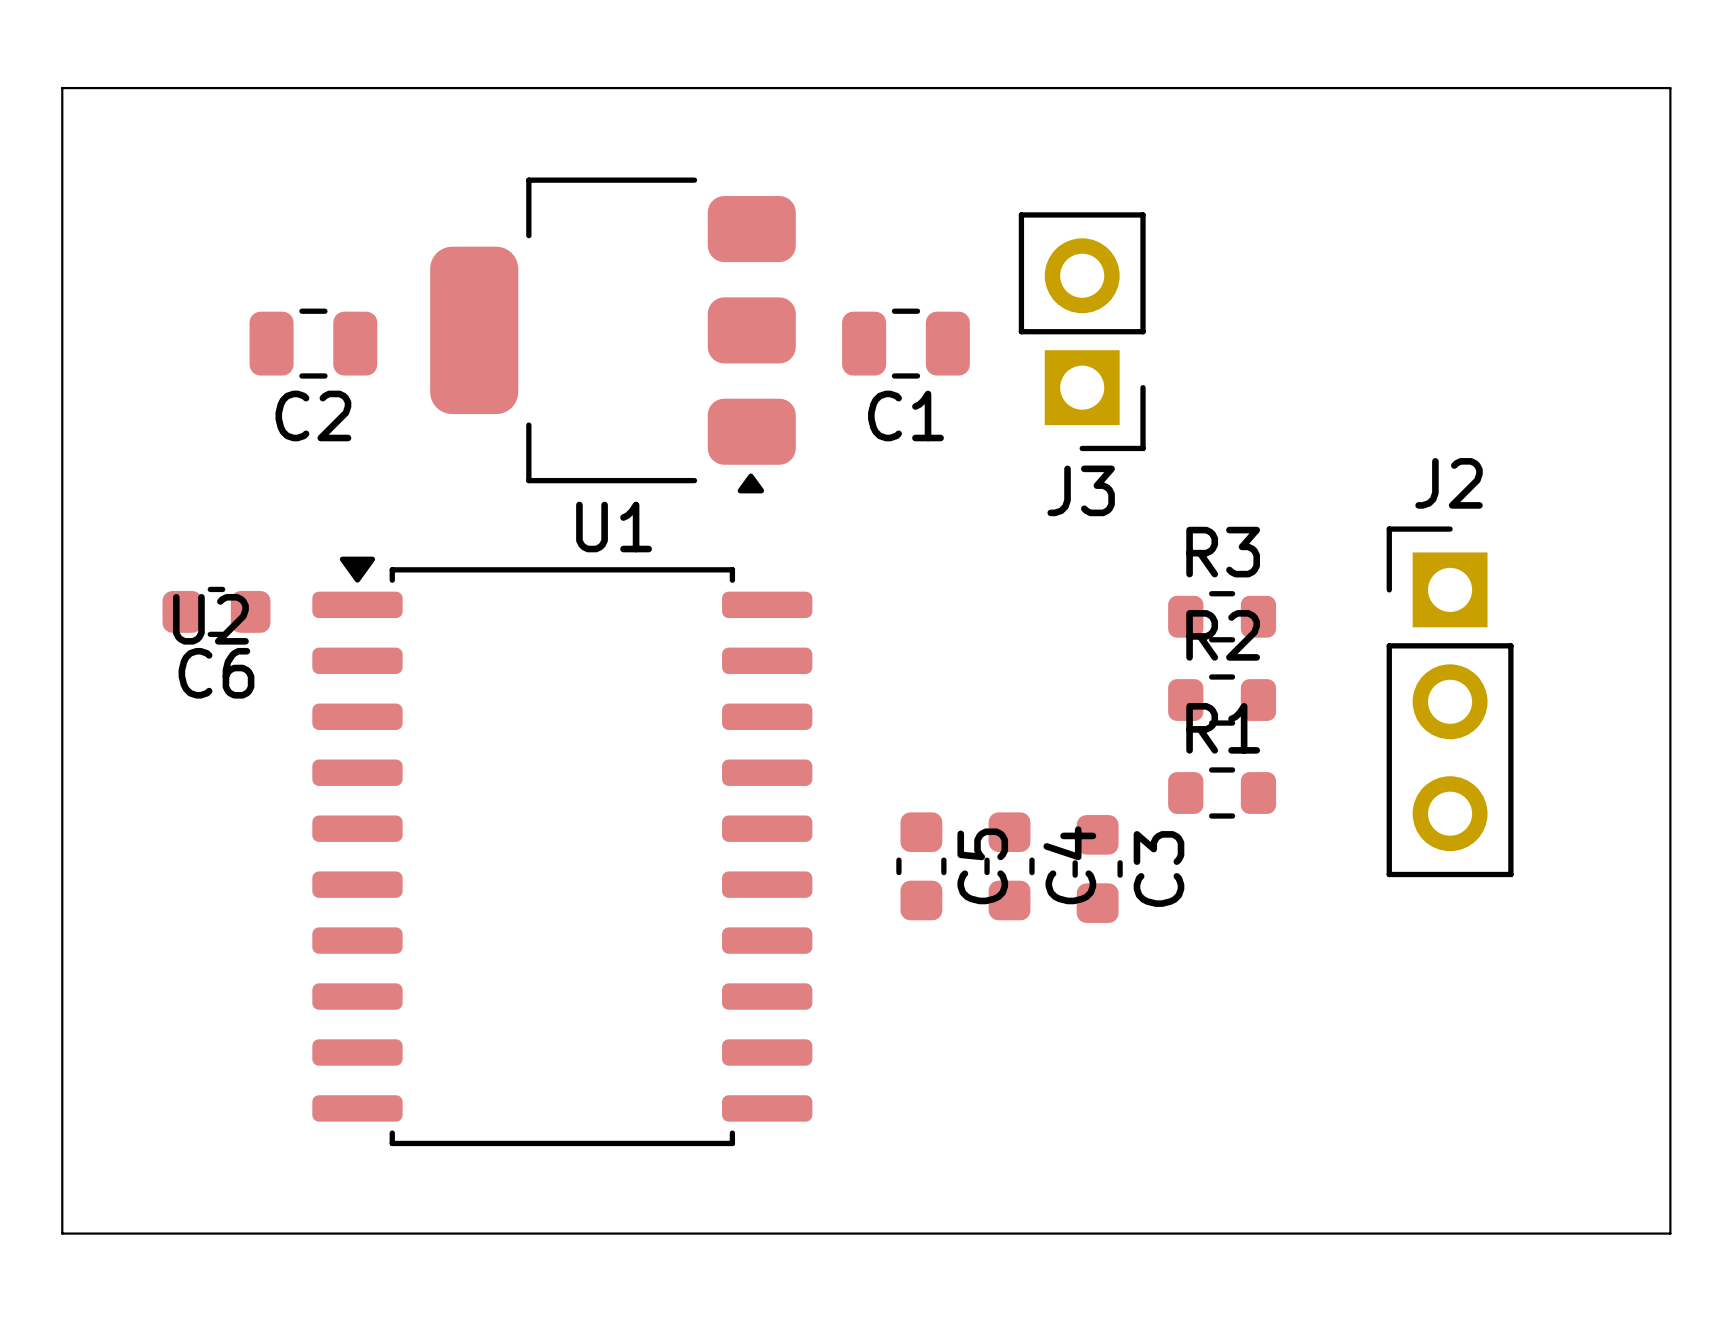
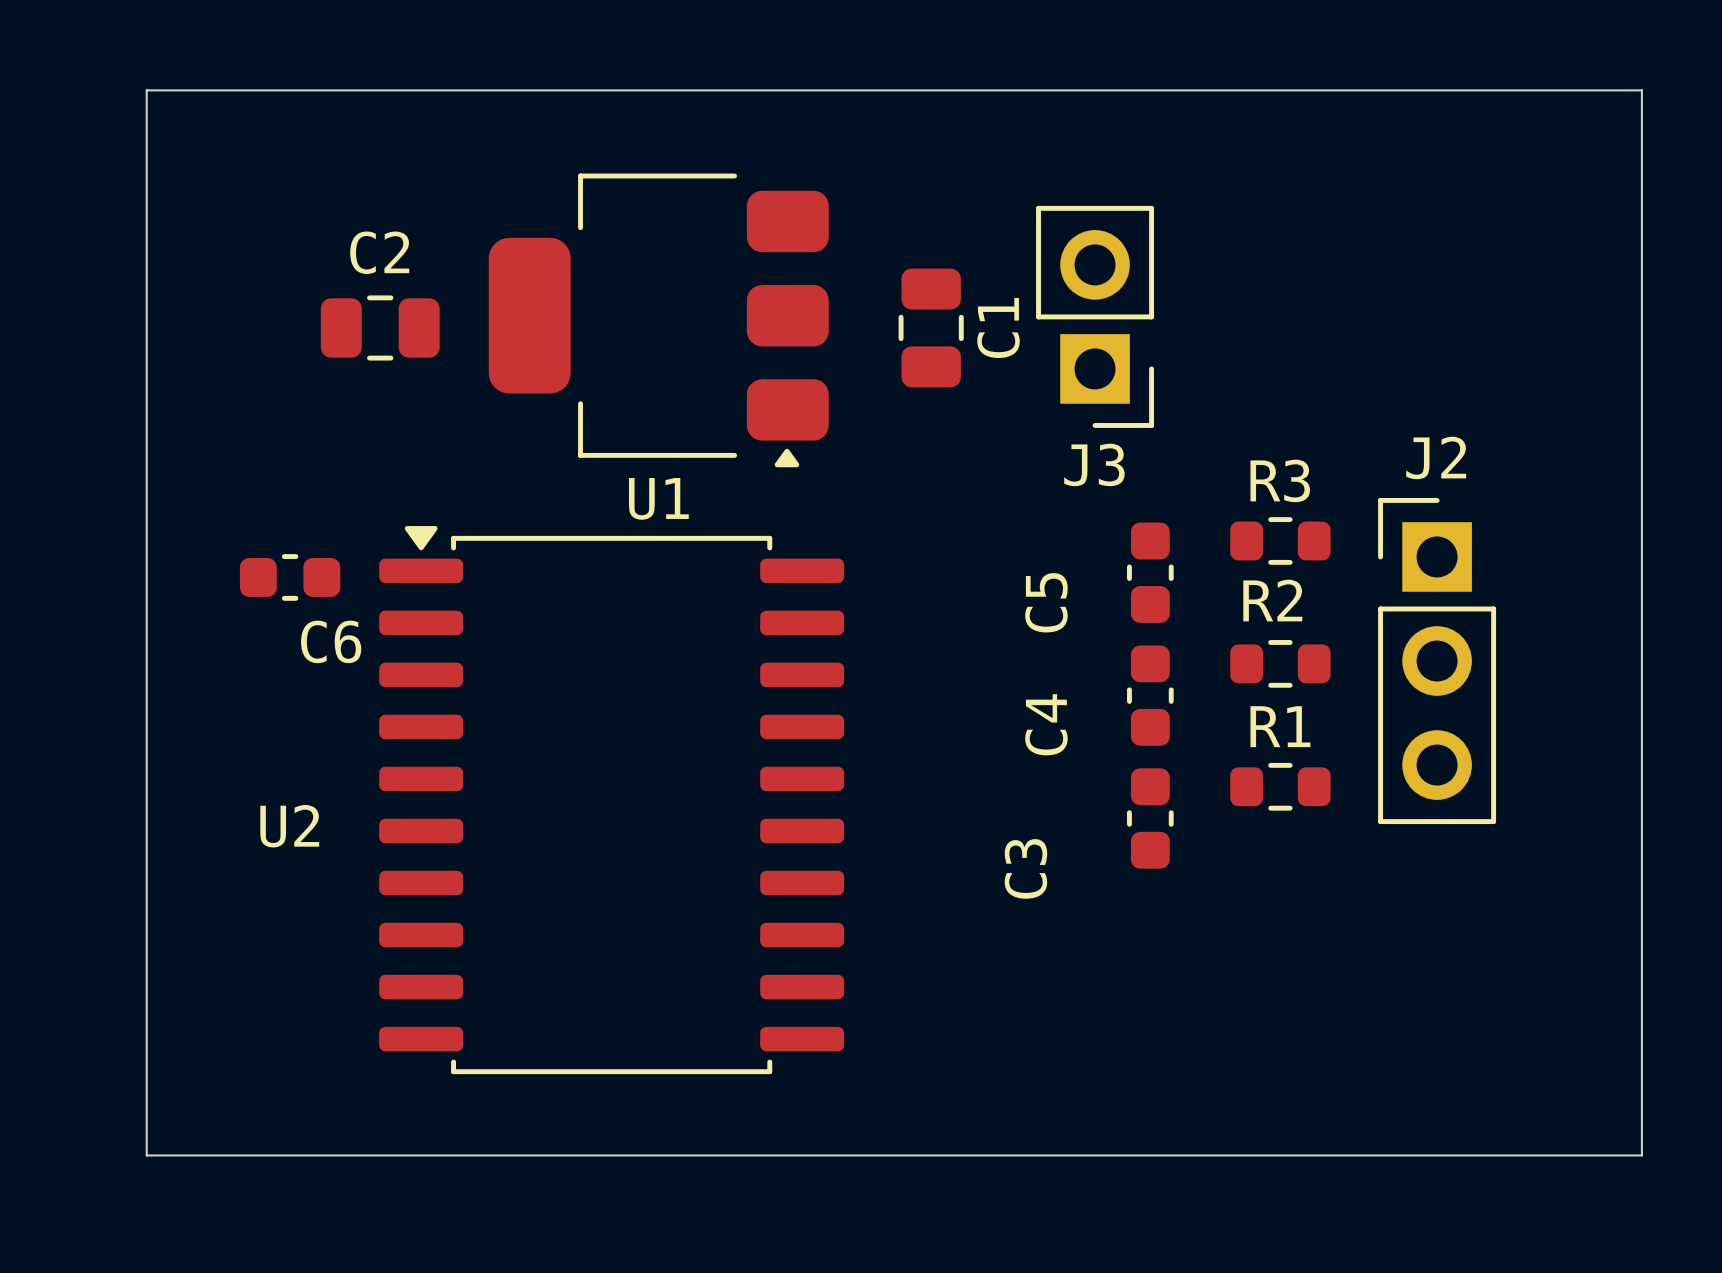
C1 rotation: 0° (905, 343) -> 90° clockwise (931, 327)
C2 name position: C2 (313, 415) -> C2 (379, 252)
C1 name position: C1 (905, 415) -> C1 (998, 327)
R3 position: (1222, 616) -> (1280, 540)
U2 name position: U2 (210, 619) -> U2 (289, 826)
R2 name position: R2 (1223, 635) -> R2 (1272, 600)
C6 name position: C6 (216, 673) -> C6 (331, 641)
R2 position: (1222, 700) -> (1280, 663)
R1 position: (1222, 792) -> (1280, 786)
C4 name position: C4 (1069, 865) -> C4 (1046, 724)
C5 position: (921, 866) -> (1150, 572)
C5 name position: C5 (982, 866) -> C5 (1046, 602)
C4 position: (1009, 866) -> (1150, 695)
C3 position: (1097, 868) -> (1150, 818)
C3 name position: C3 (1158, 868) -> C3 (1025, 868)

